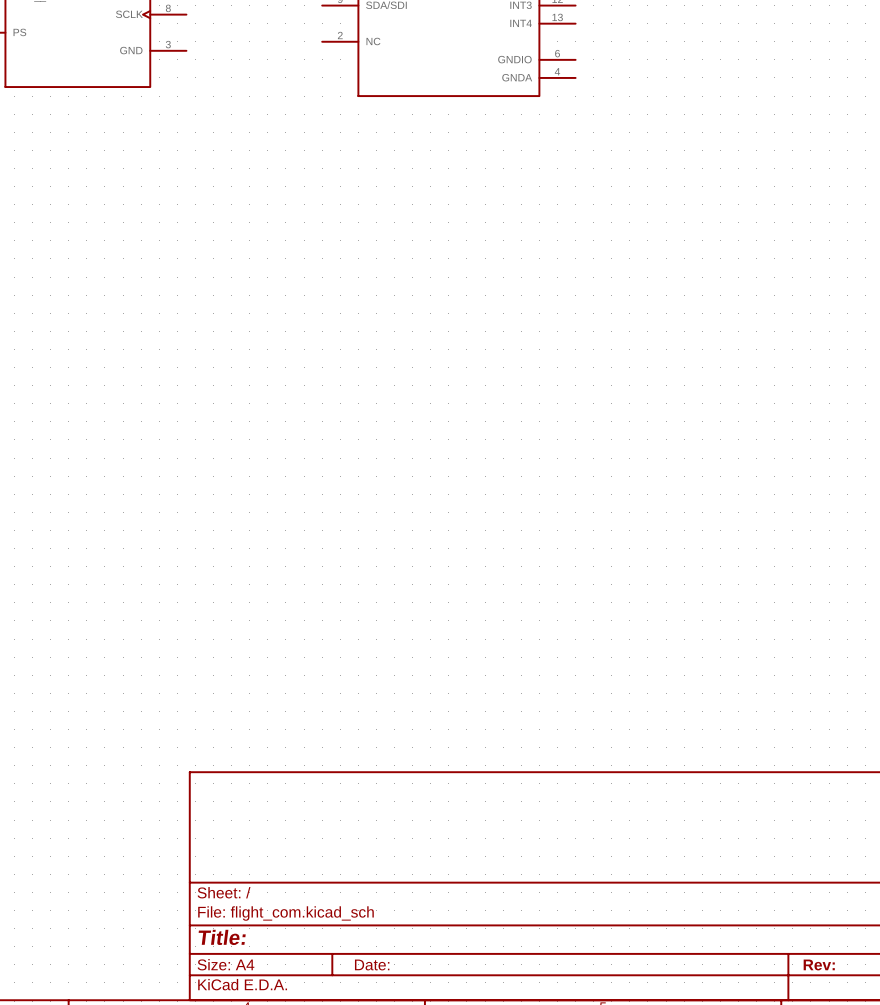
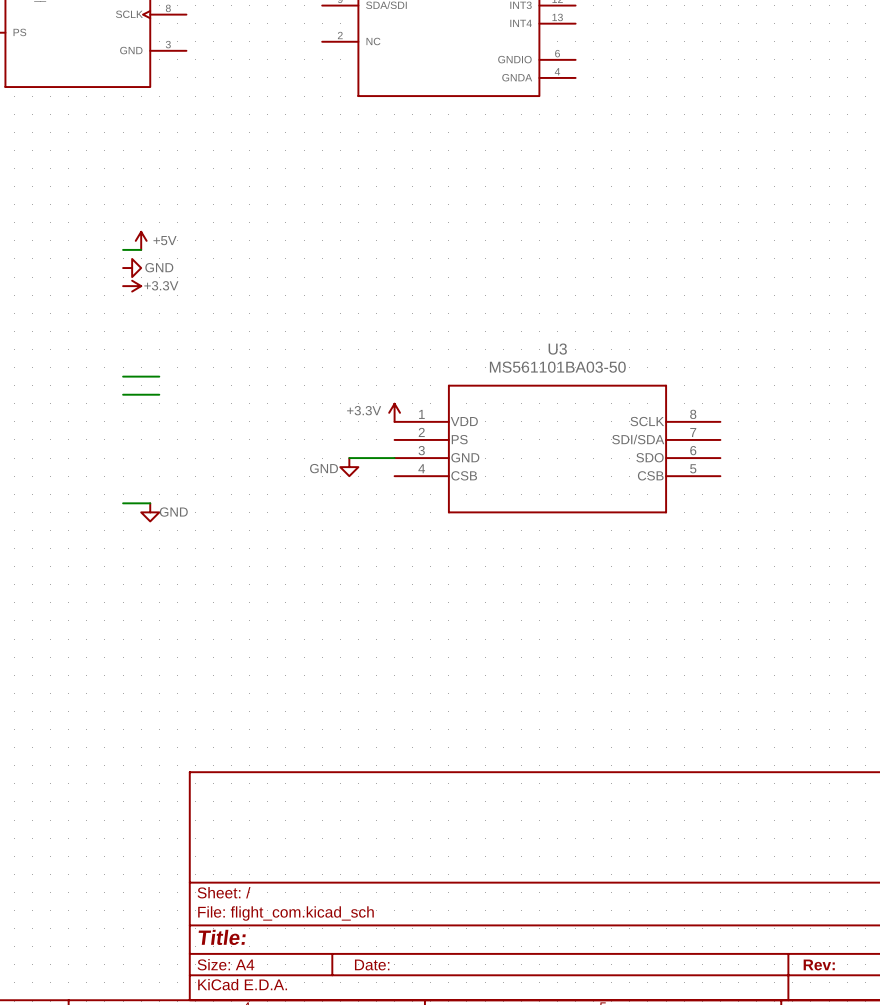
power symbol: none -> +5V (141, 240)
wire: none -> (123, 249) (141, 249)
power symbol: none -> GND (132, 268)
power symbol: none -> +3.3V (132, 286)
wire: none -> (123, 376) (159, 376)
wire: none -> (123, 394) (159, 394)
power symbol: none -> +3.3V (394, 412)
U3: none -> MS561101BA03-50 (557, 449)
wire: none -> (349, 458) (394, 458)
power symbol: none -> GND (349, 467)
wire: none -> (123, 503) (150, 503)
power symbol: none -> GND (150, 512)

